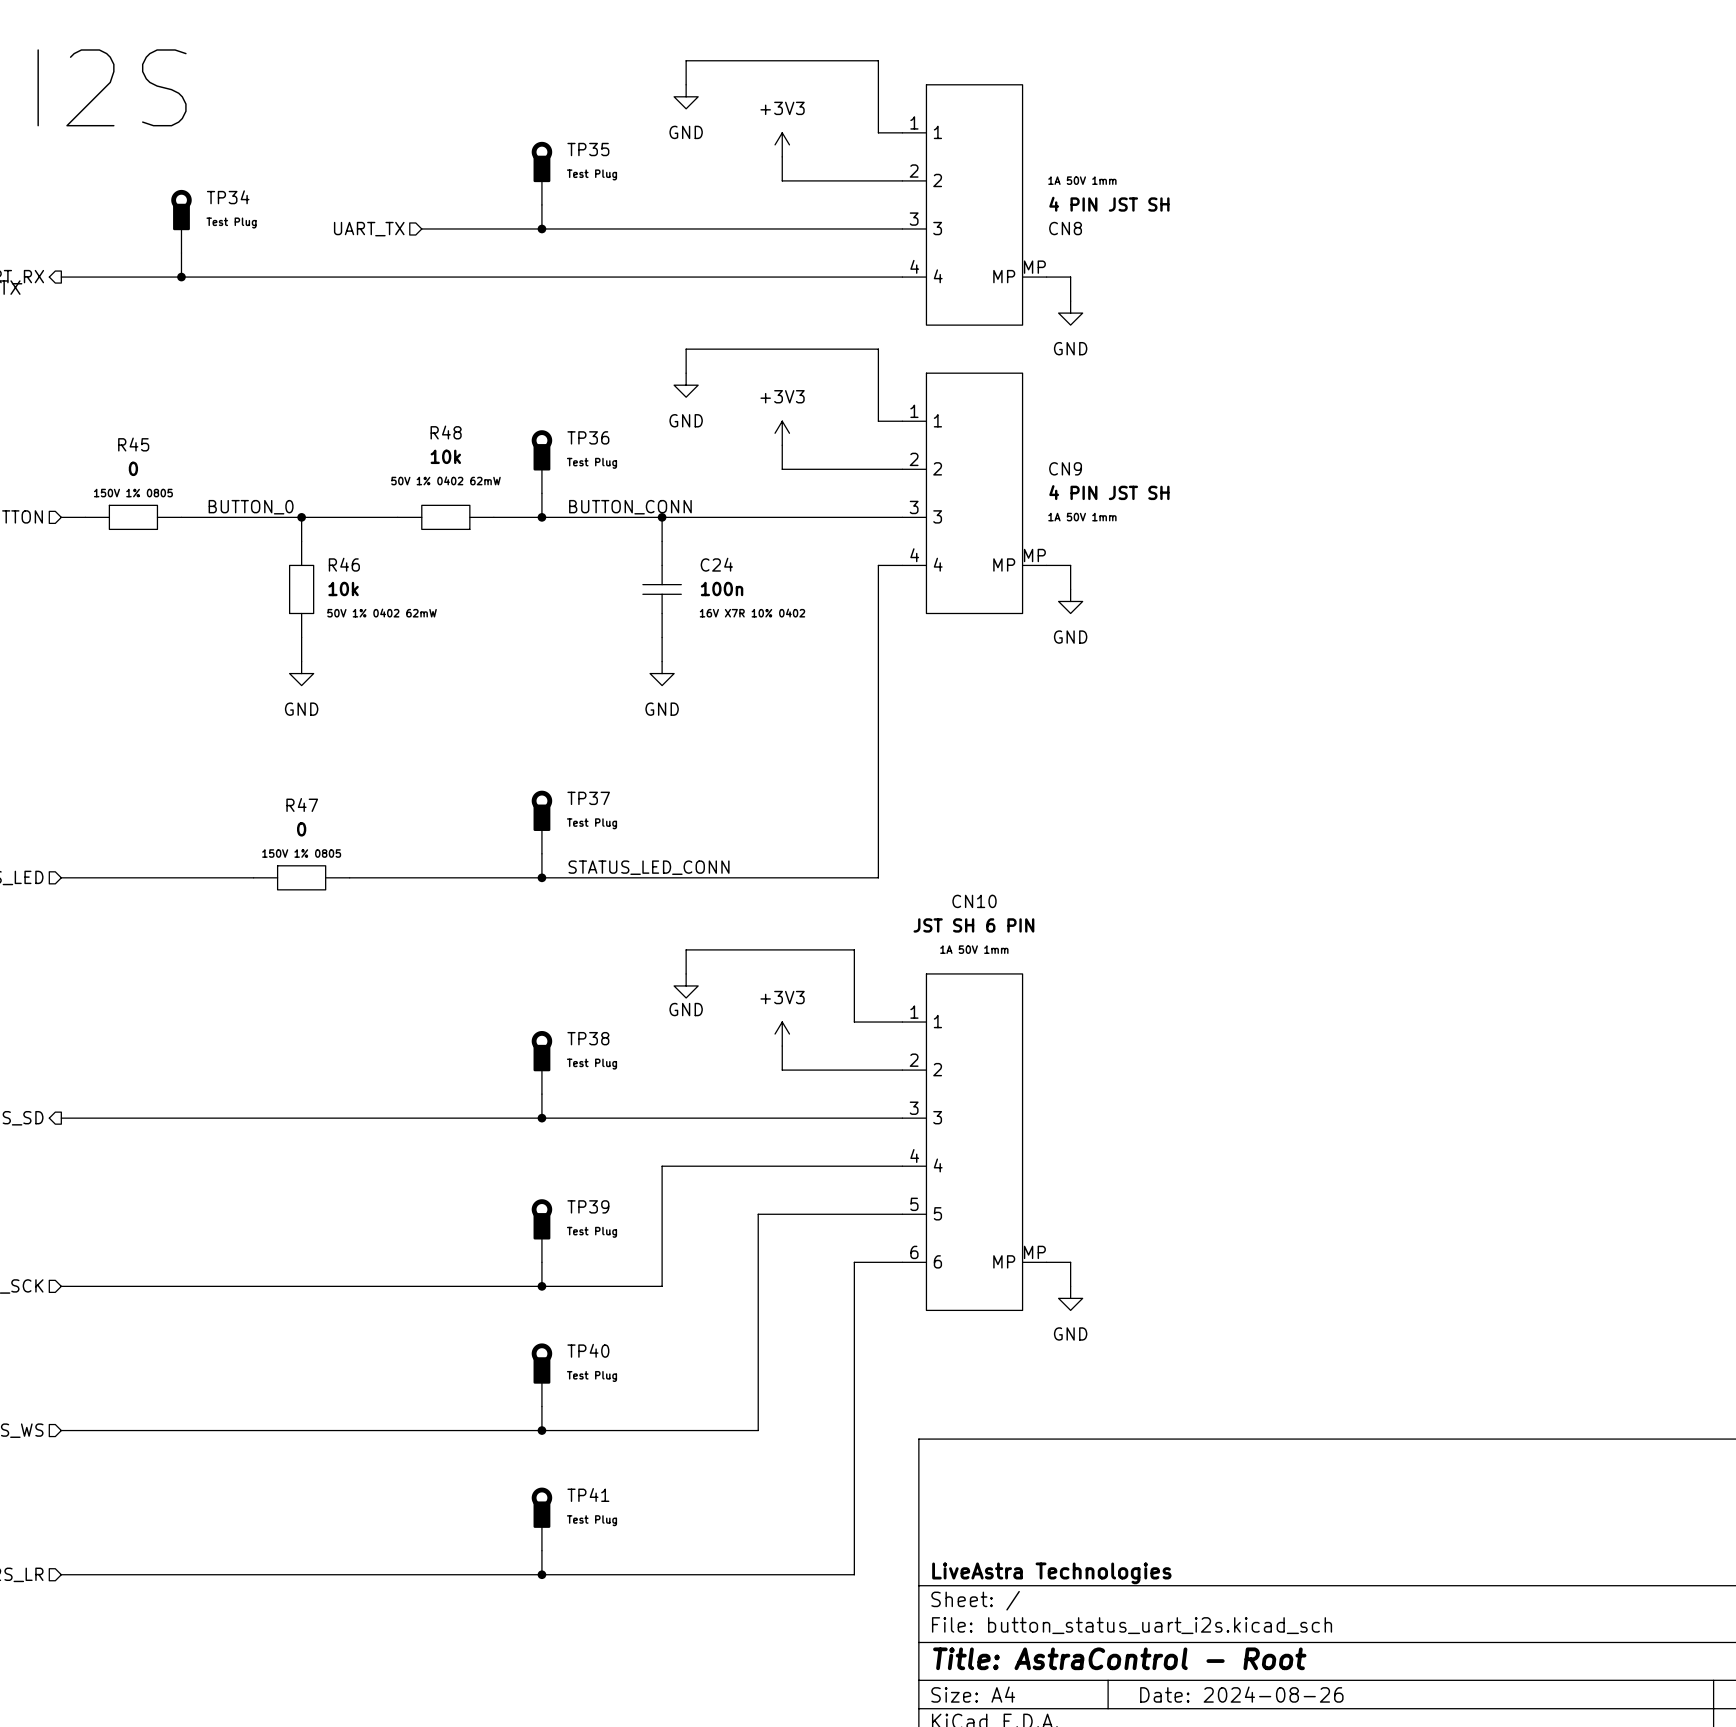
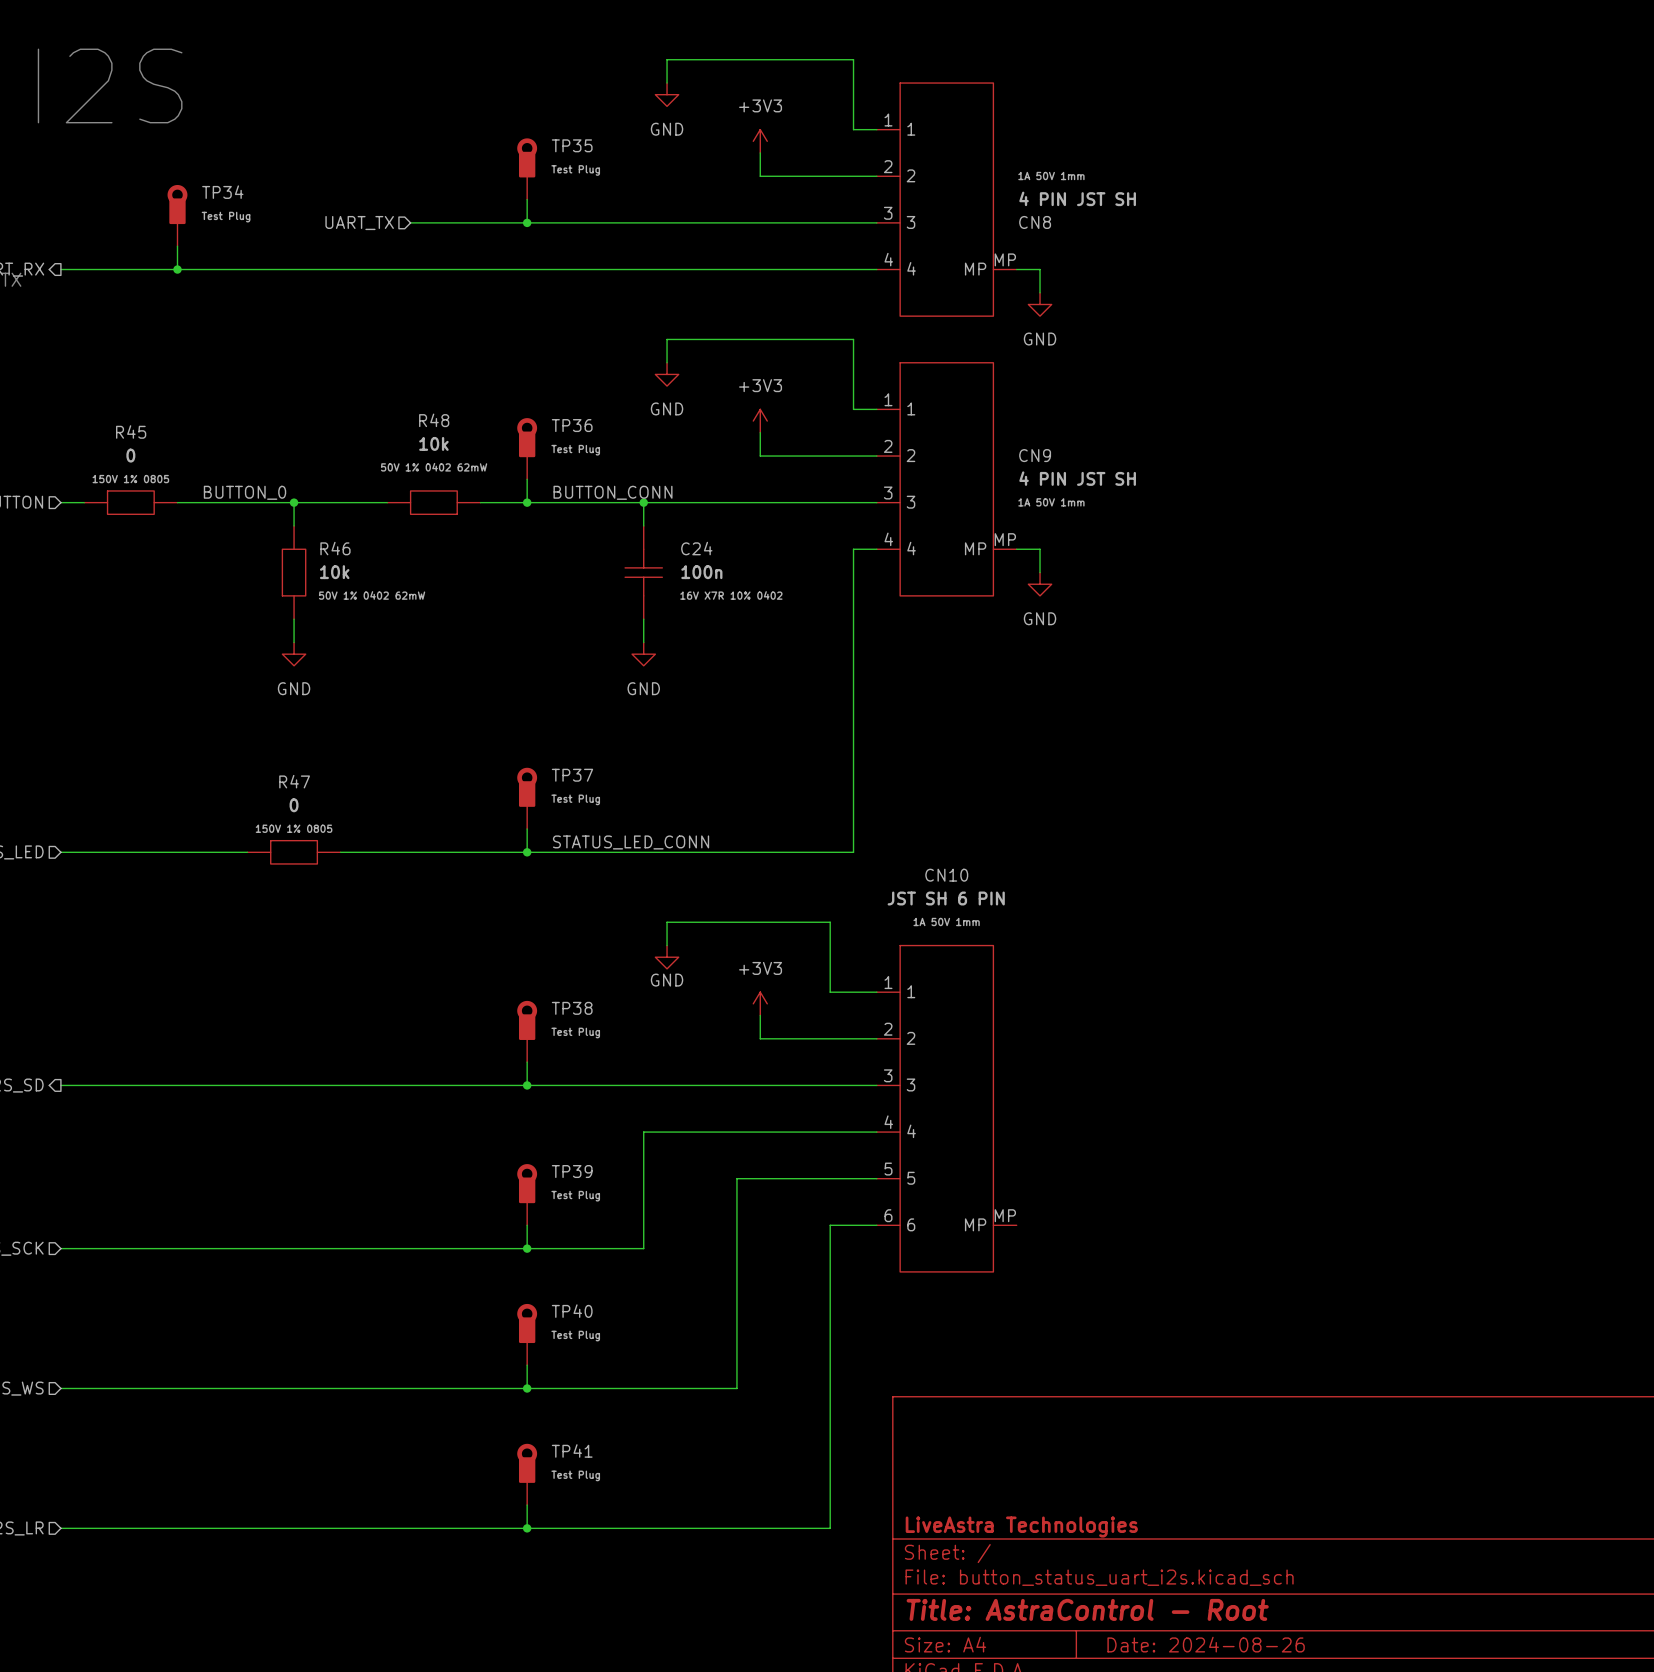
wire: (1046, 1262) (1070, 1262) (1070, 1286) -> none
power symbol: GND (1070, 1298) -> none

